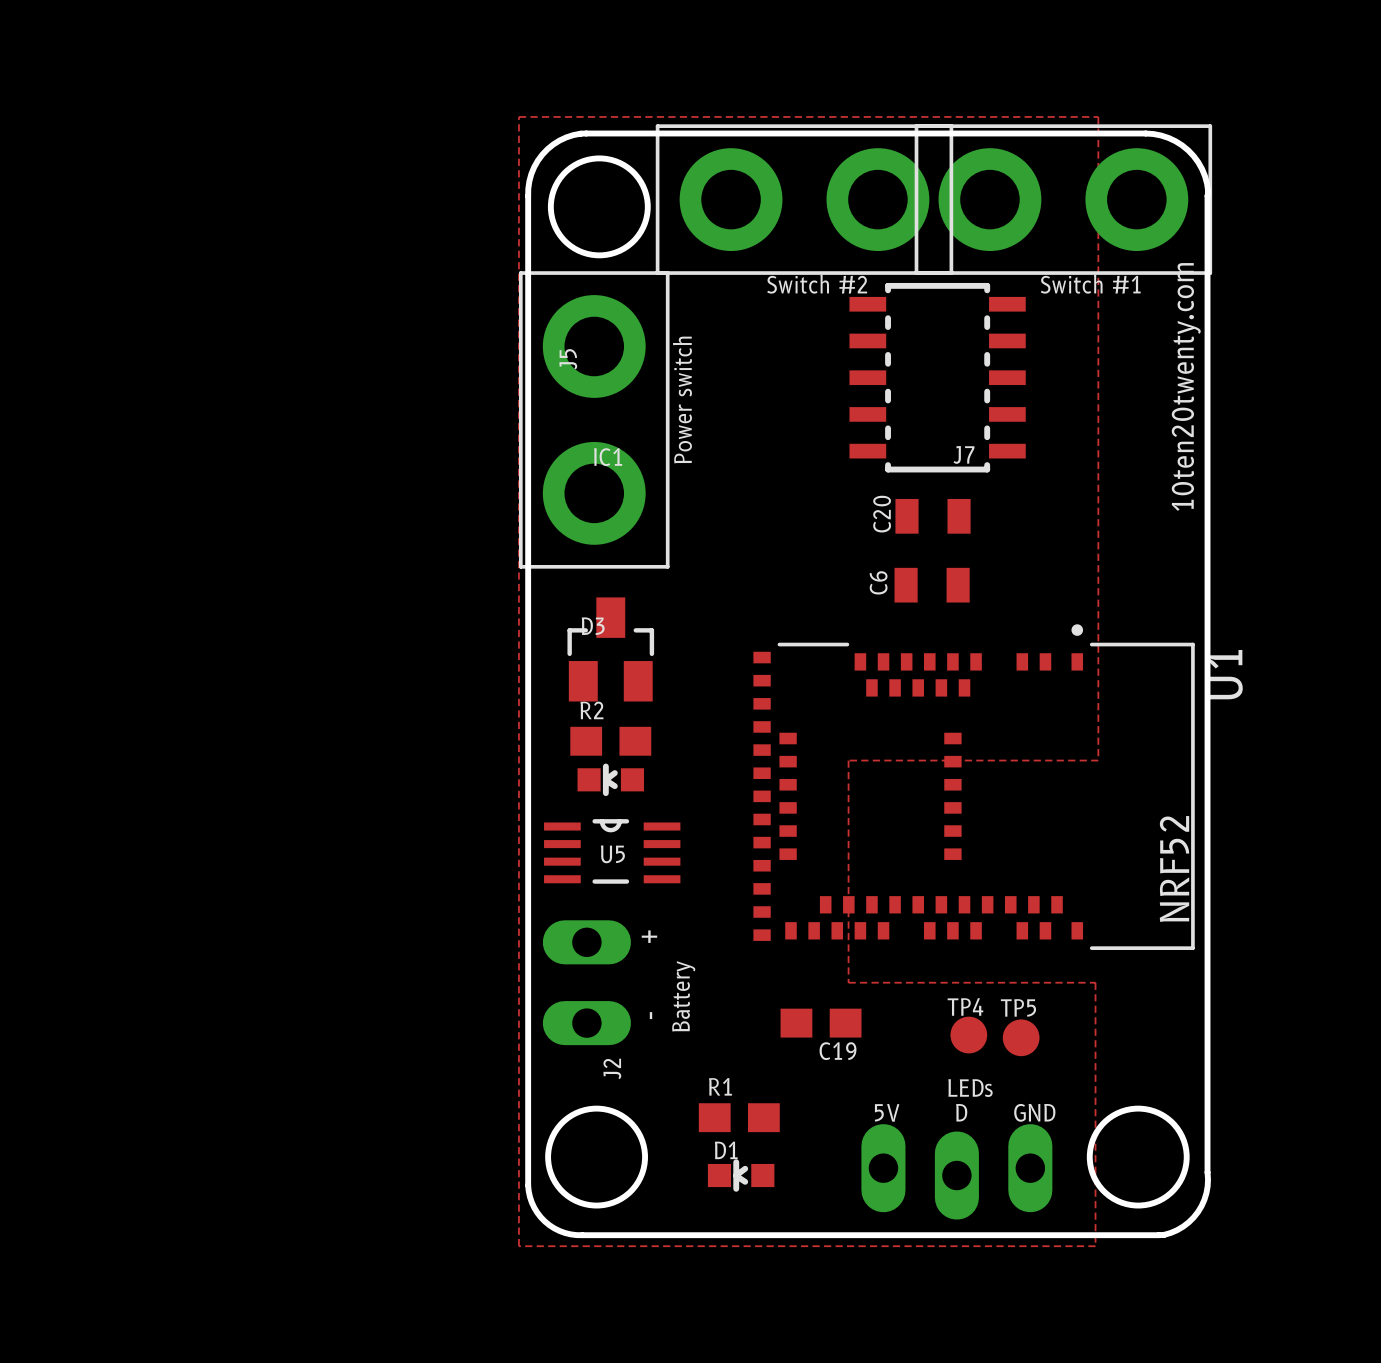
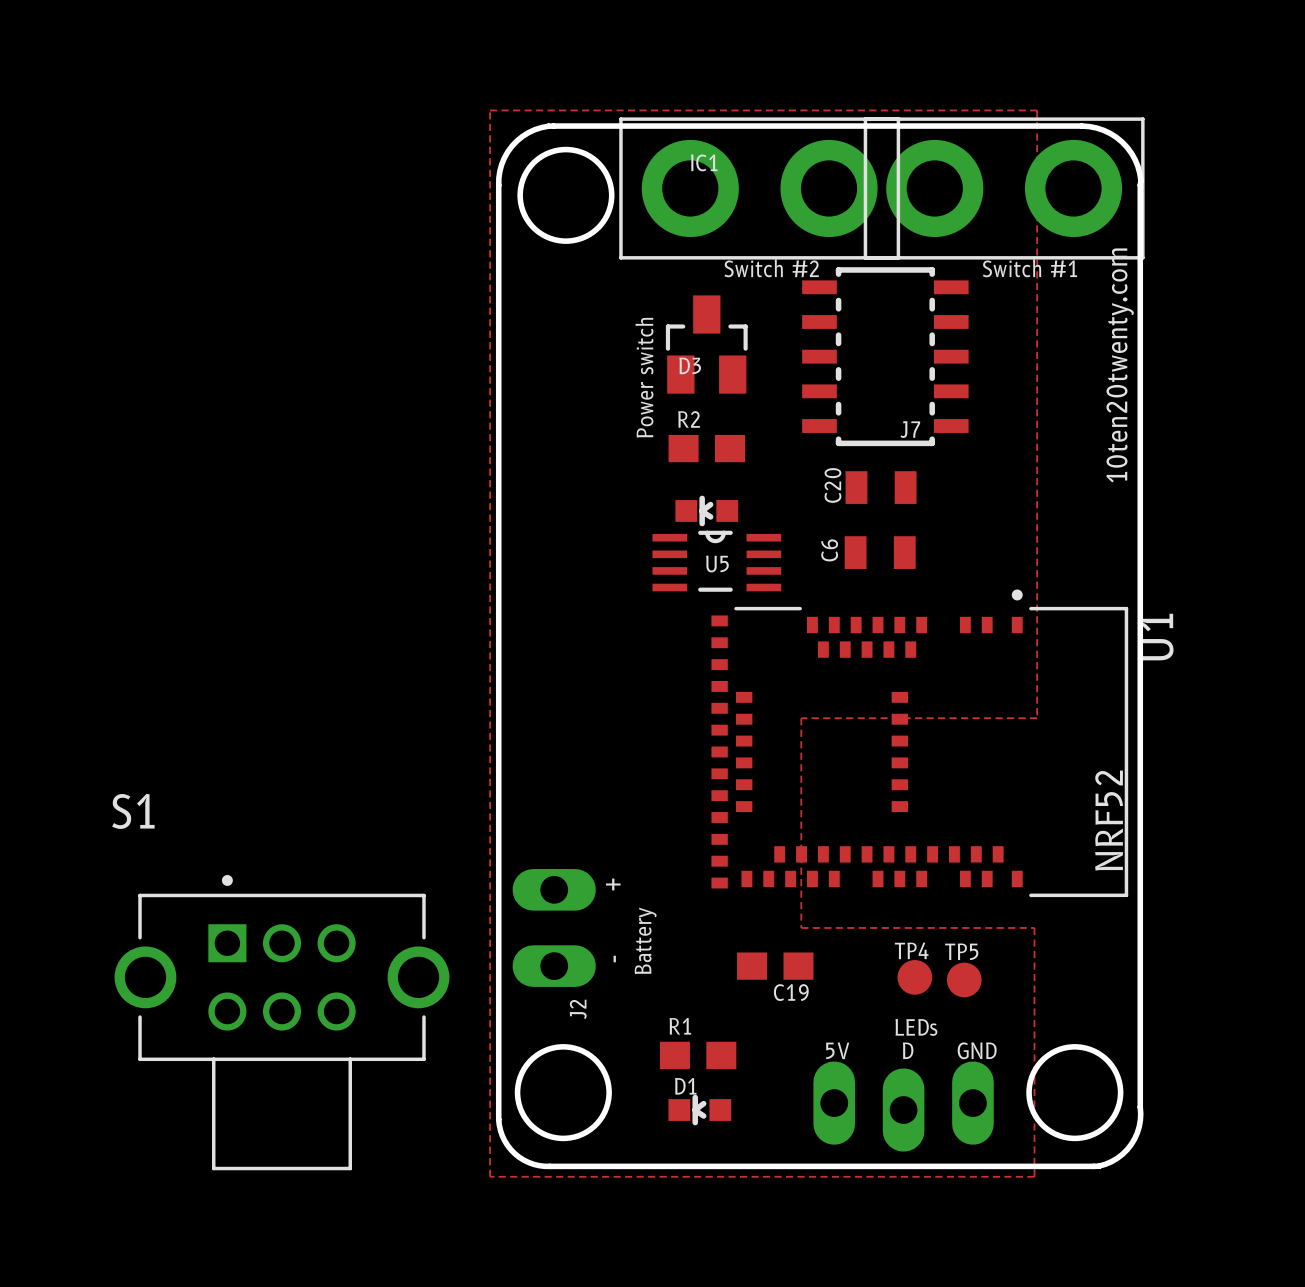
J5: (594, 419) -> none
IC1 position: (610, 649) -> (706, 344)
R2 position: (610, 741) -> (706, 448)
D3 position: (610, 779) -> (706, 510)
U5 position: (612, 851) -> (716, 561)
S1: none -> (281, 1022)

